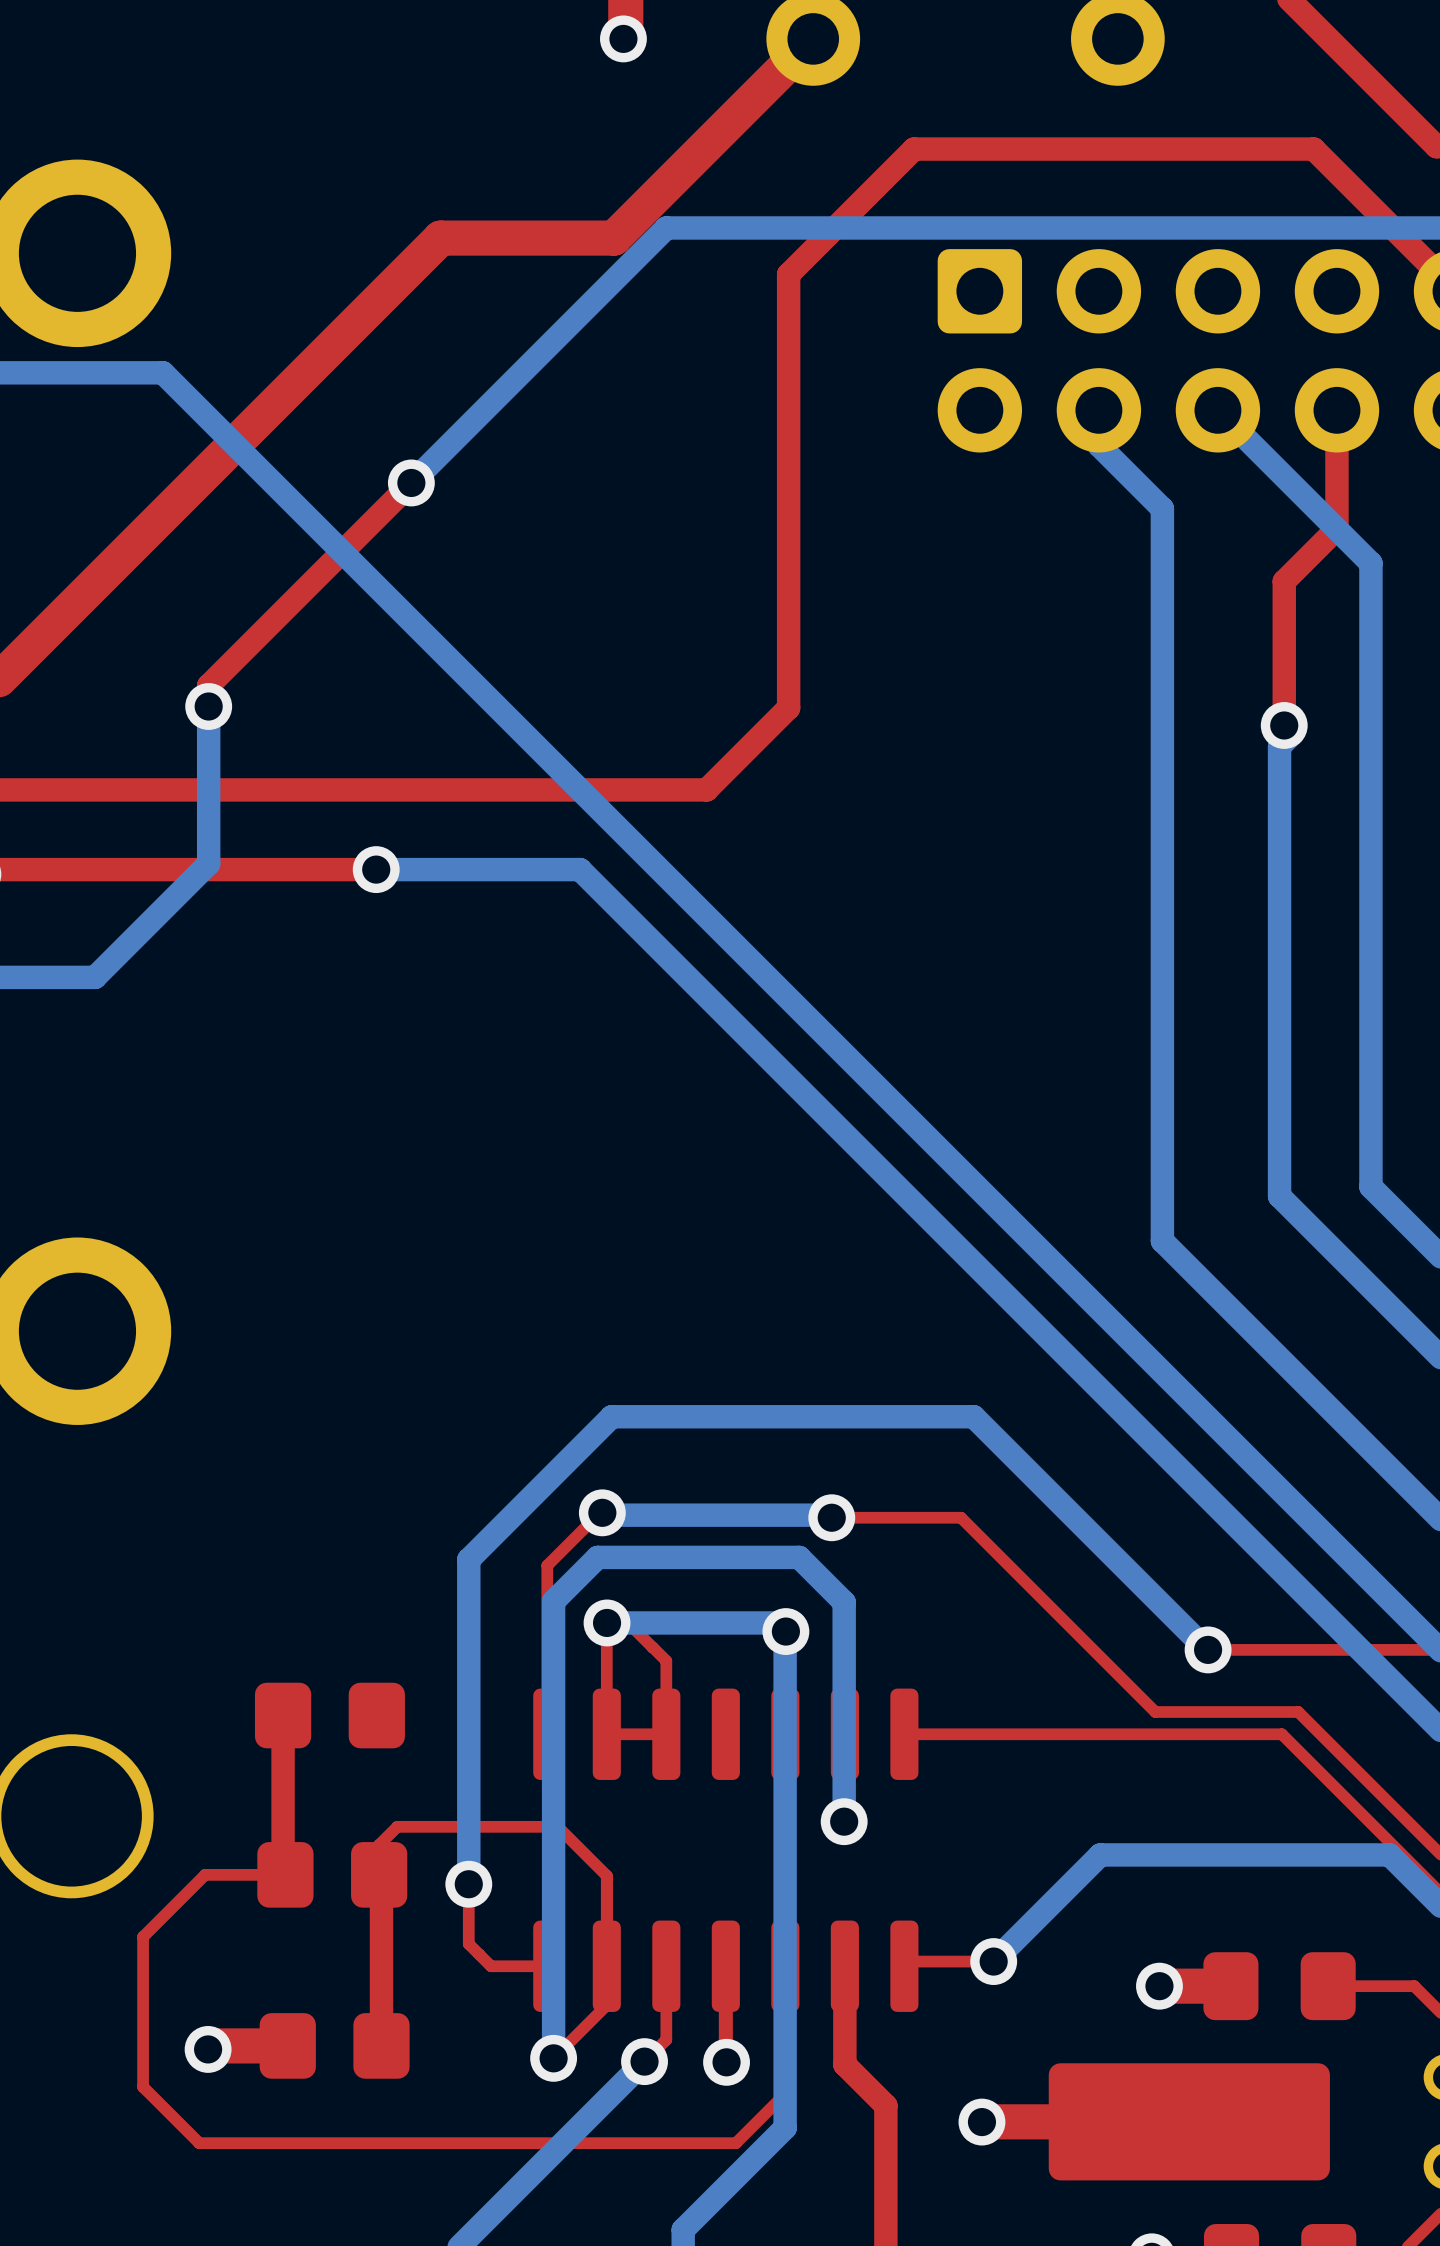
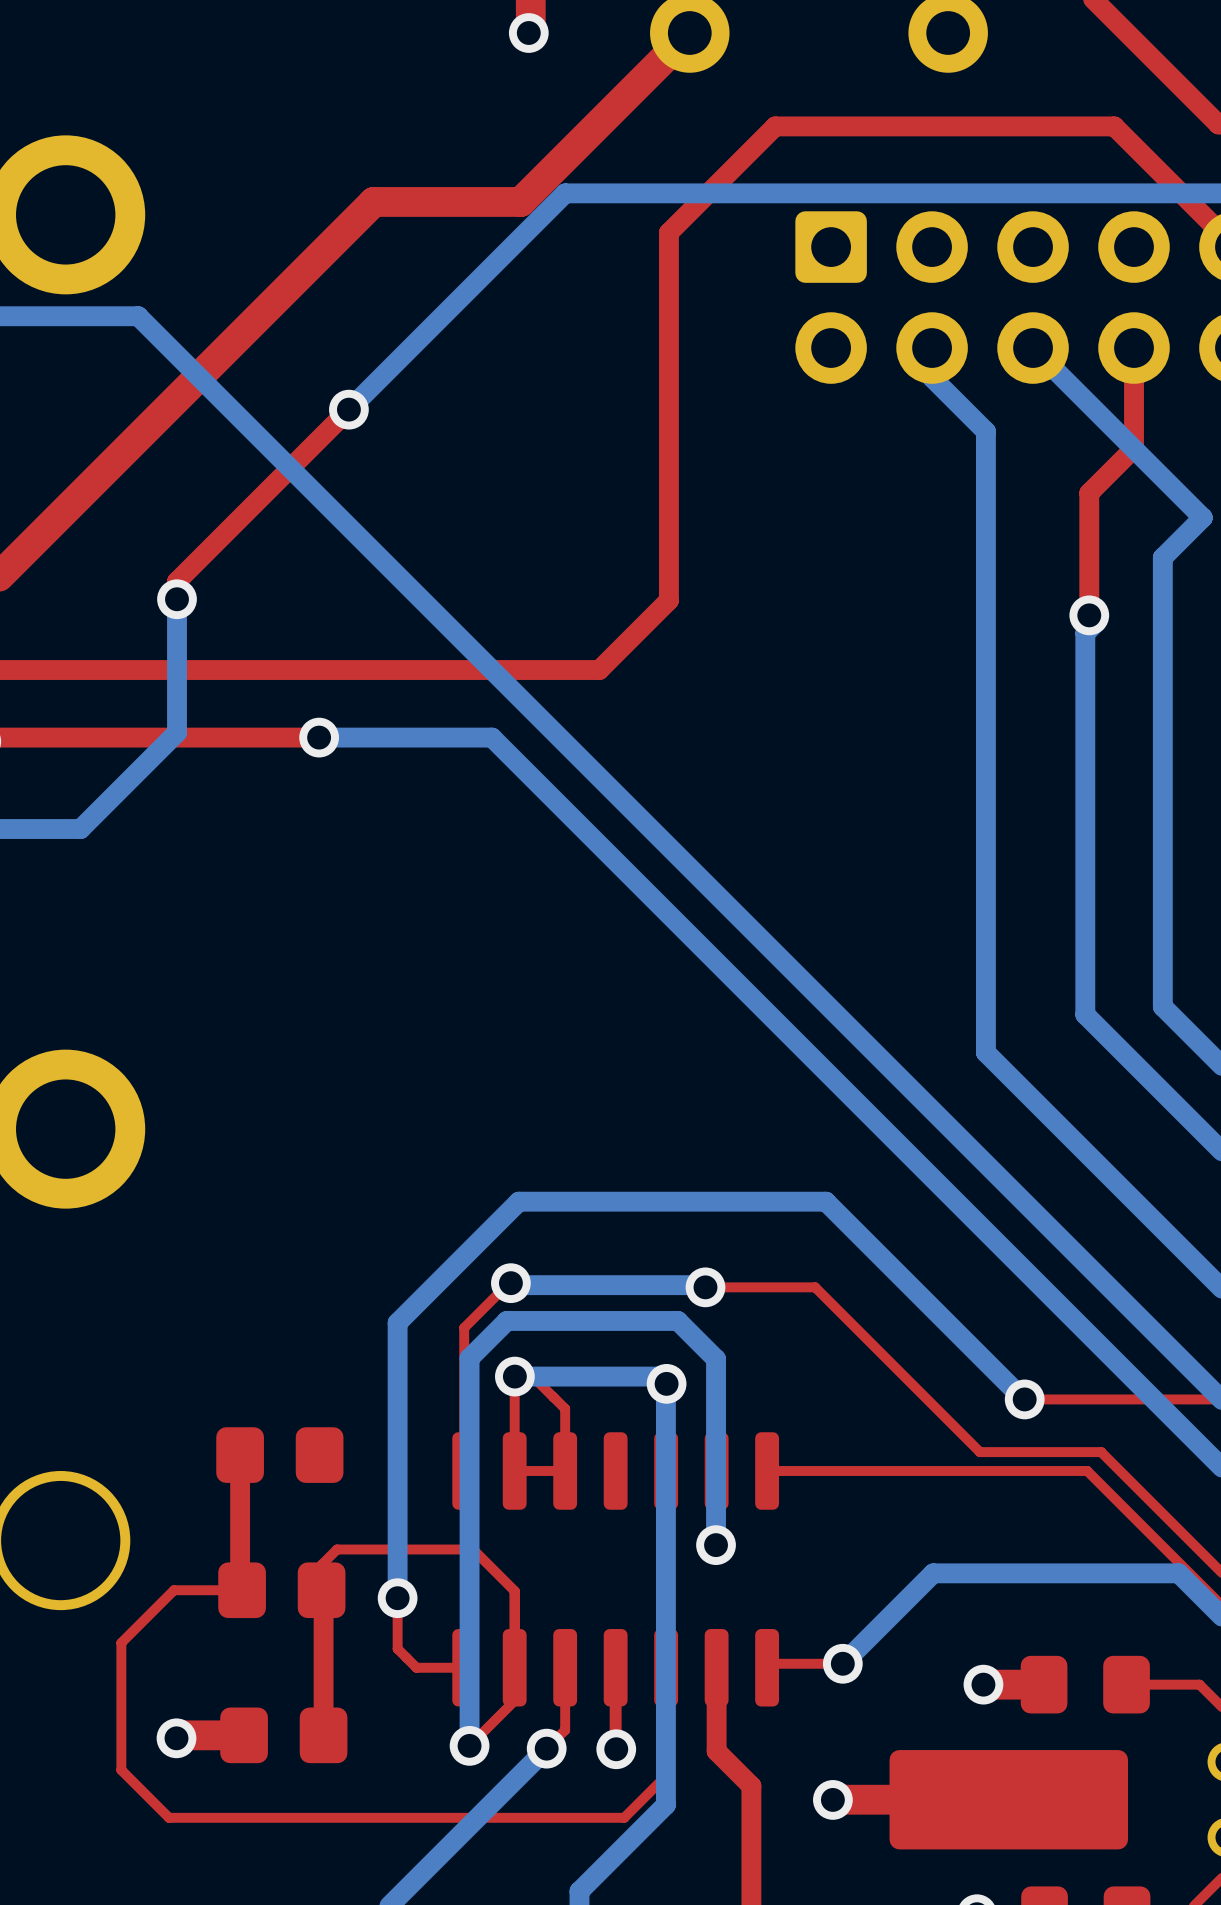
bottom track: (1370, 563) (1370, 657) -> (1162, 477) (1202, 517) (1162, 557)

